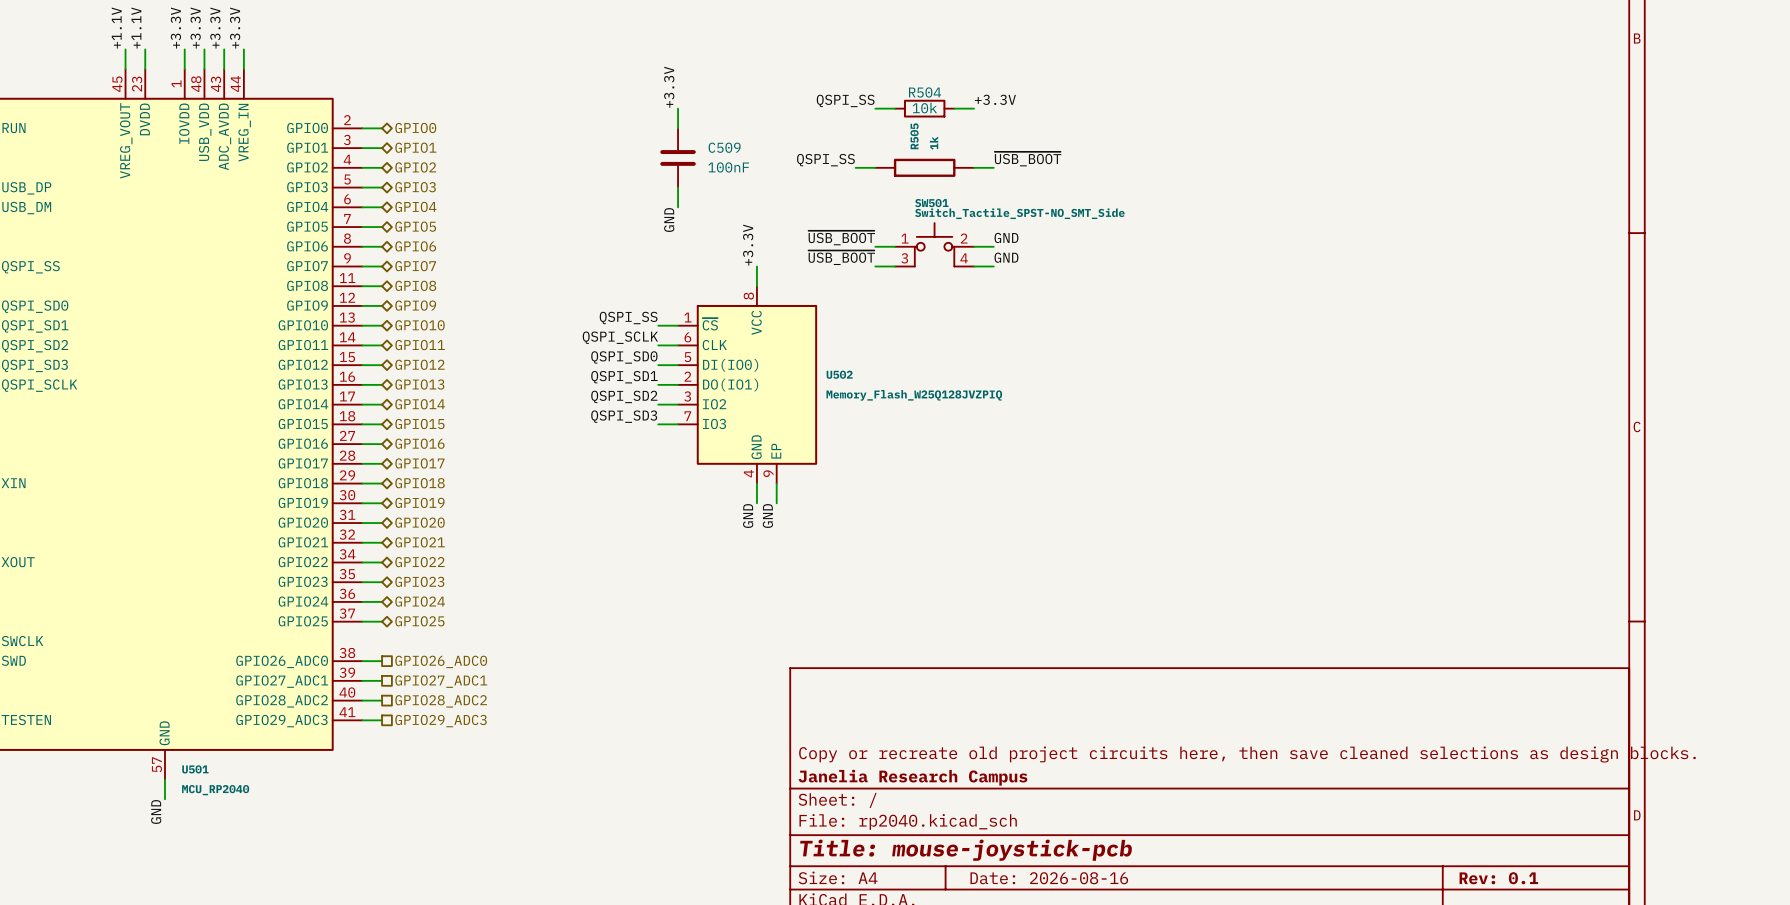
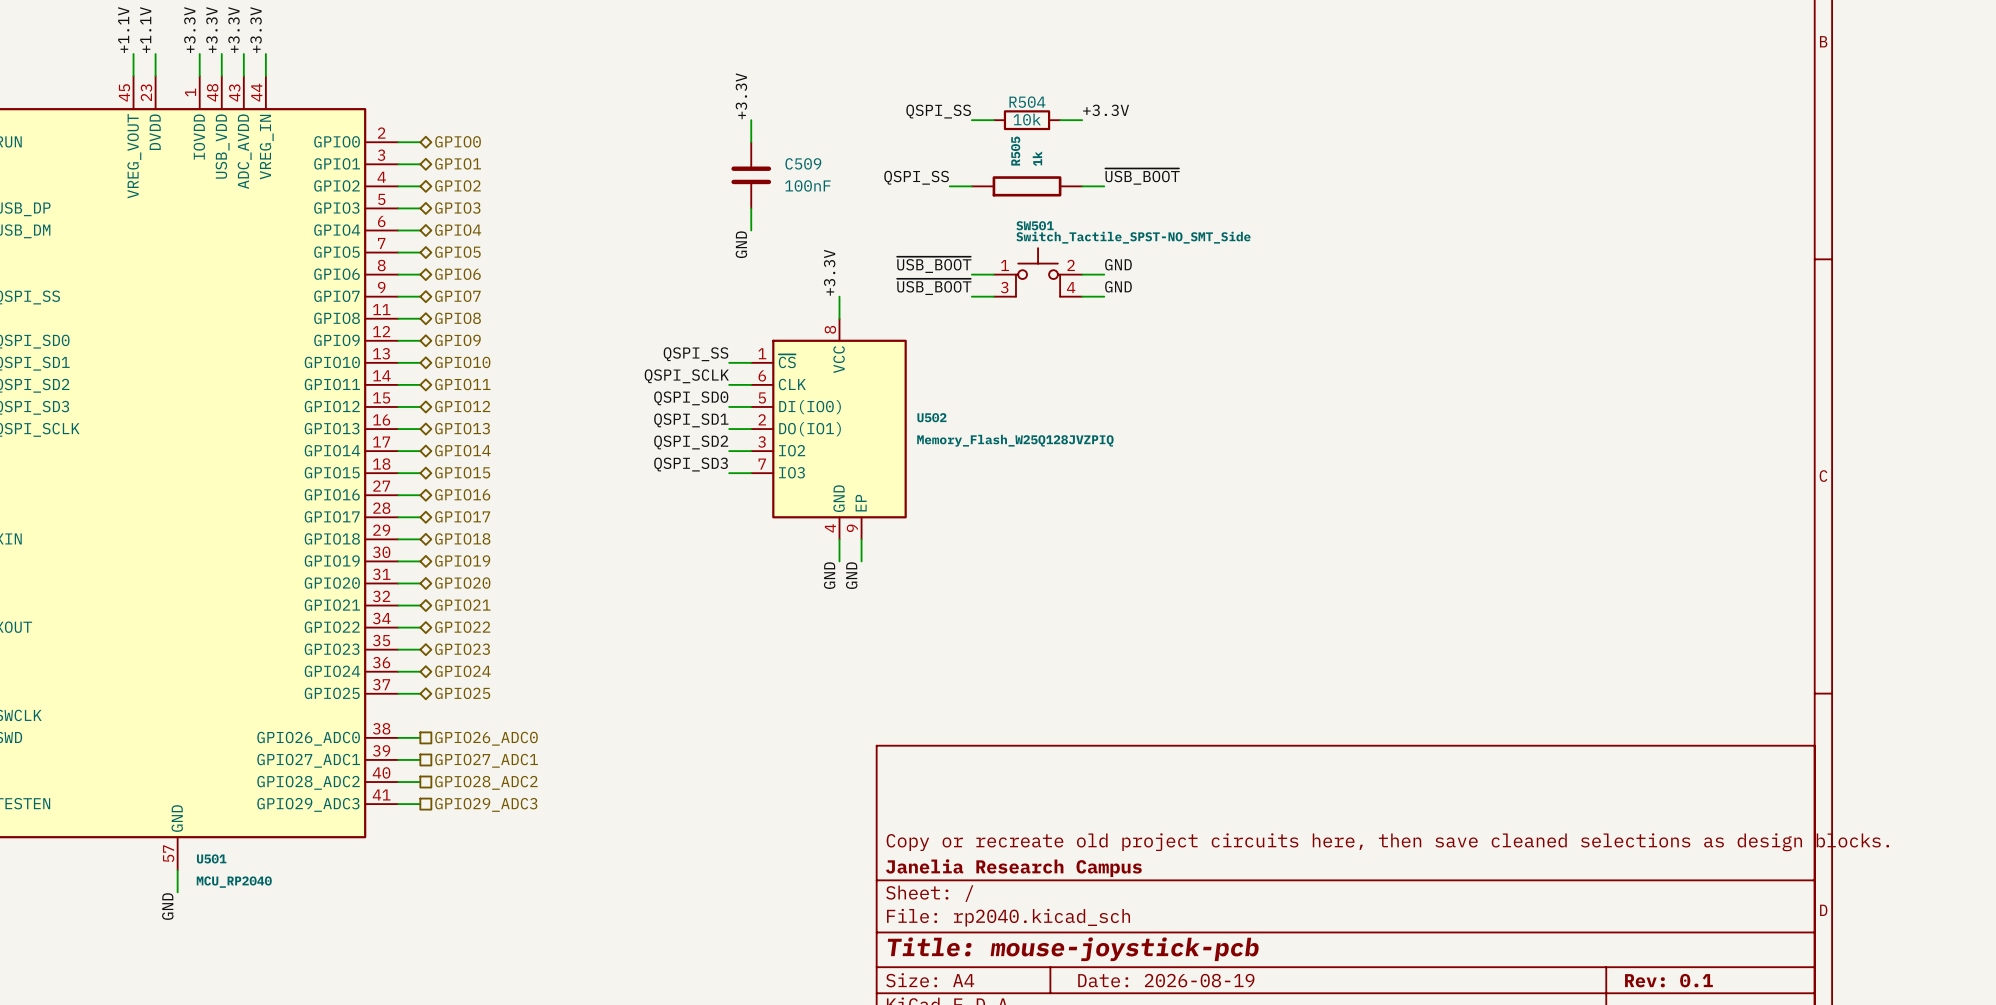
title block: Date: 2026-08-16 (1049, 878) -> Date: 2026-08-19 (1166, 980)

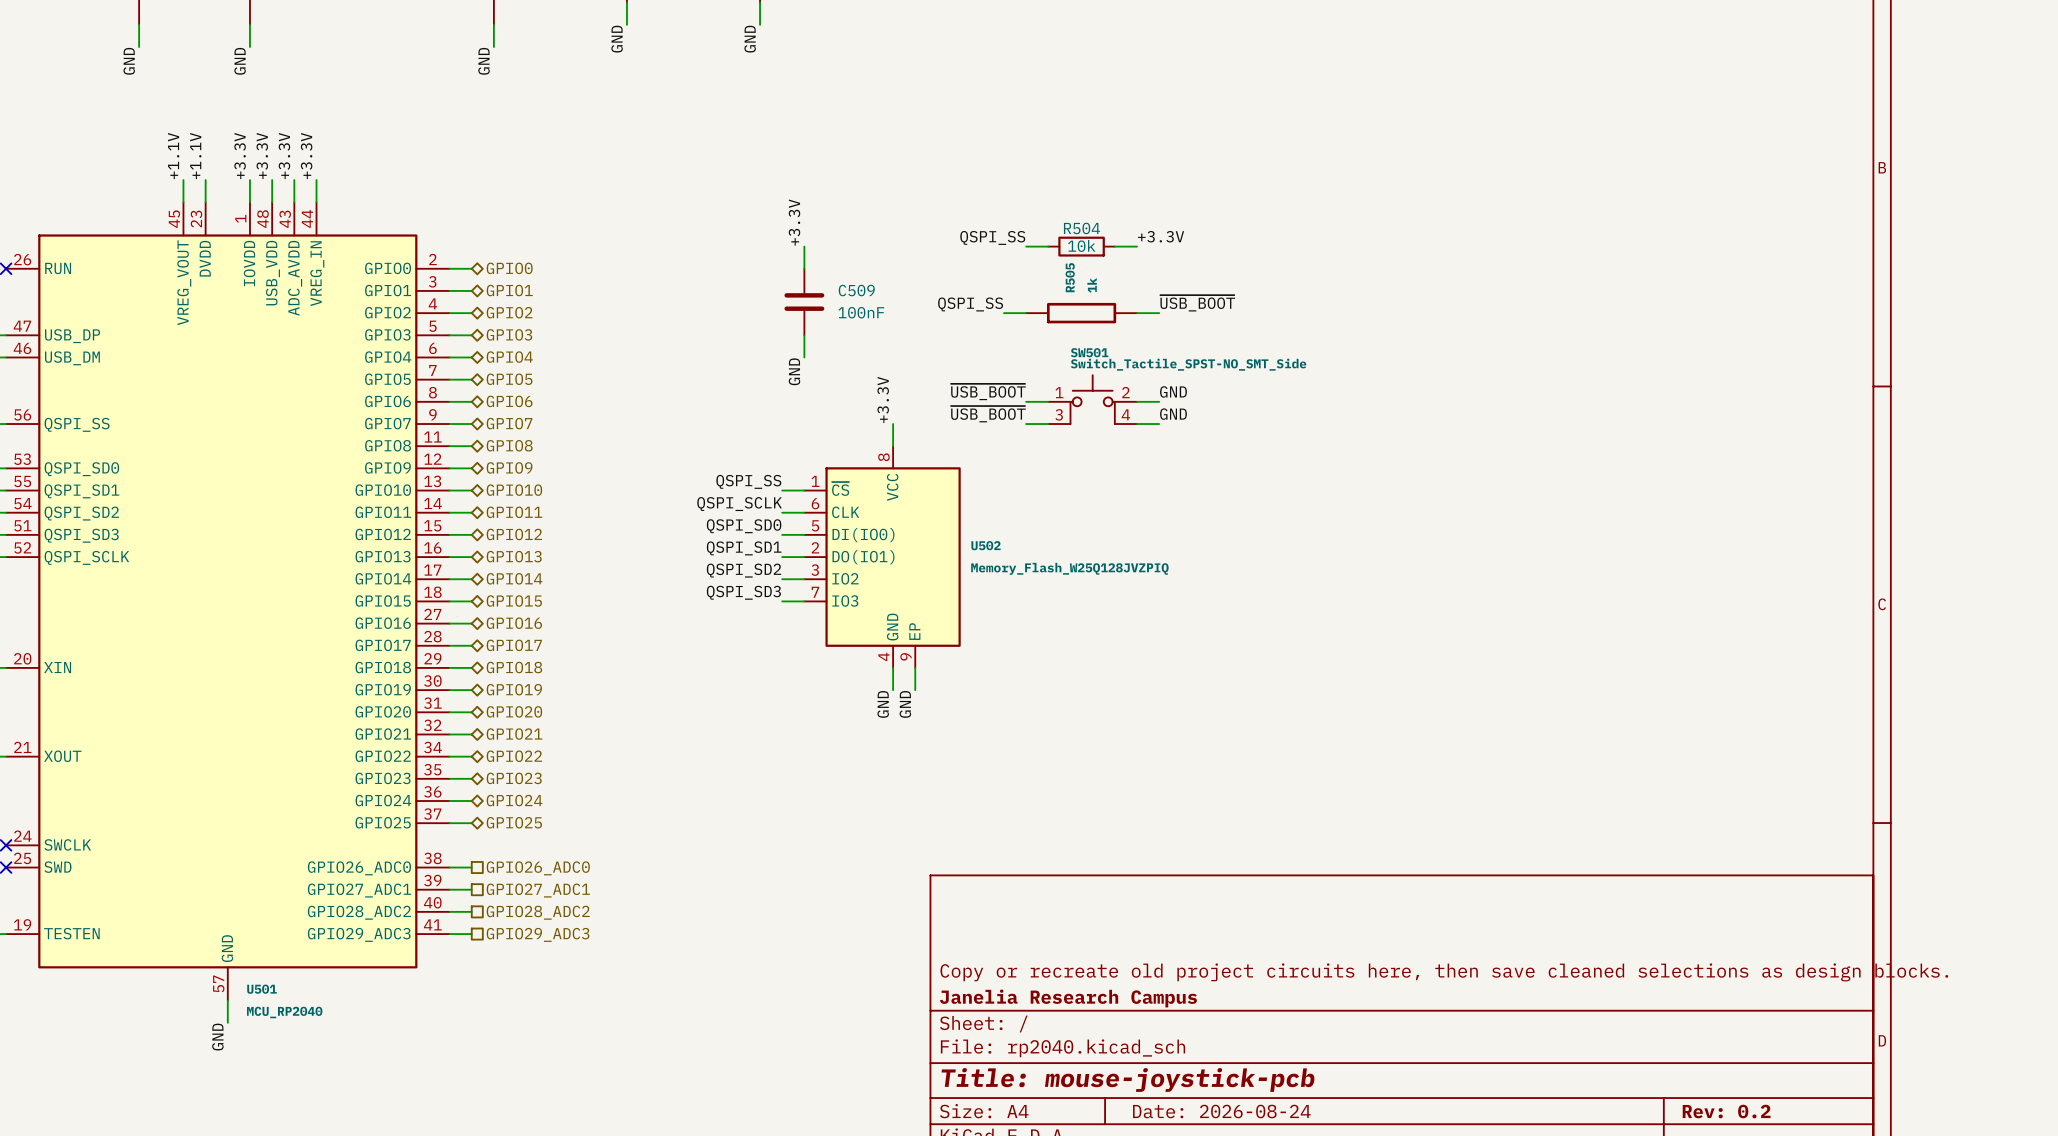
title block: Date: 2026-08-19 (1166, 980) -> Date: 2026-08-24 (1221, 1111)
title block: Rev: 0.1 (1668, 980) -> Rev: 0.2 (1726, 1111)

